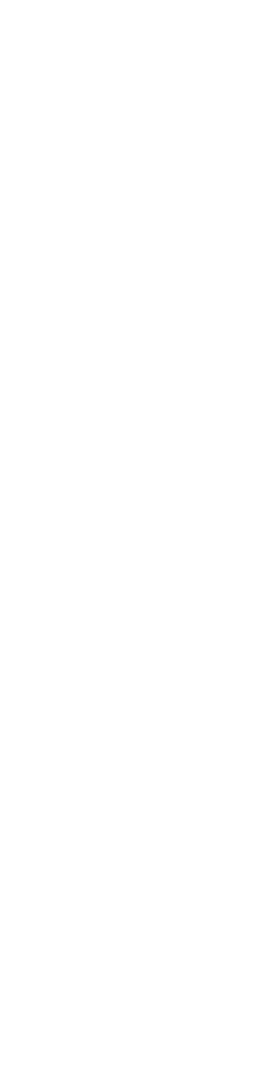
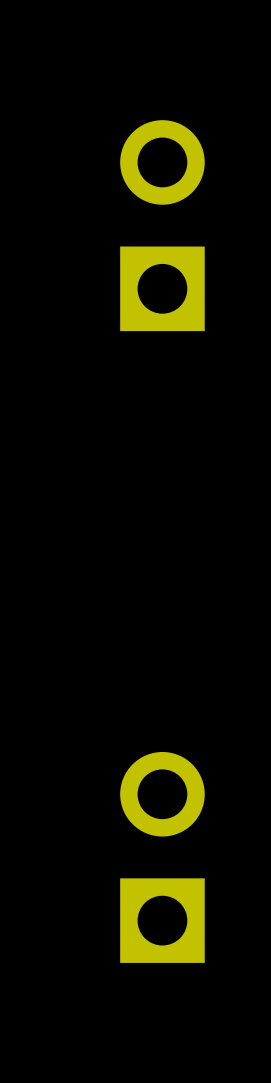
part: none -> (162, 225)
part: none -> (162, 857)

